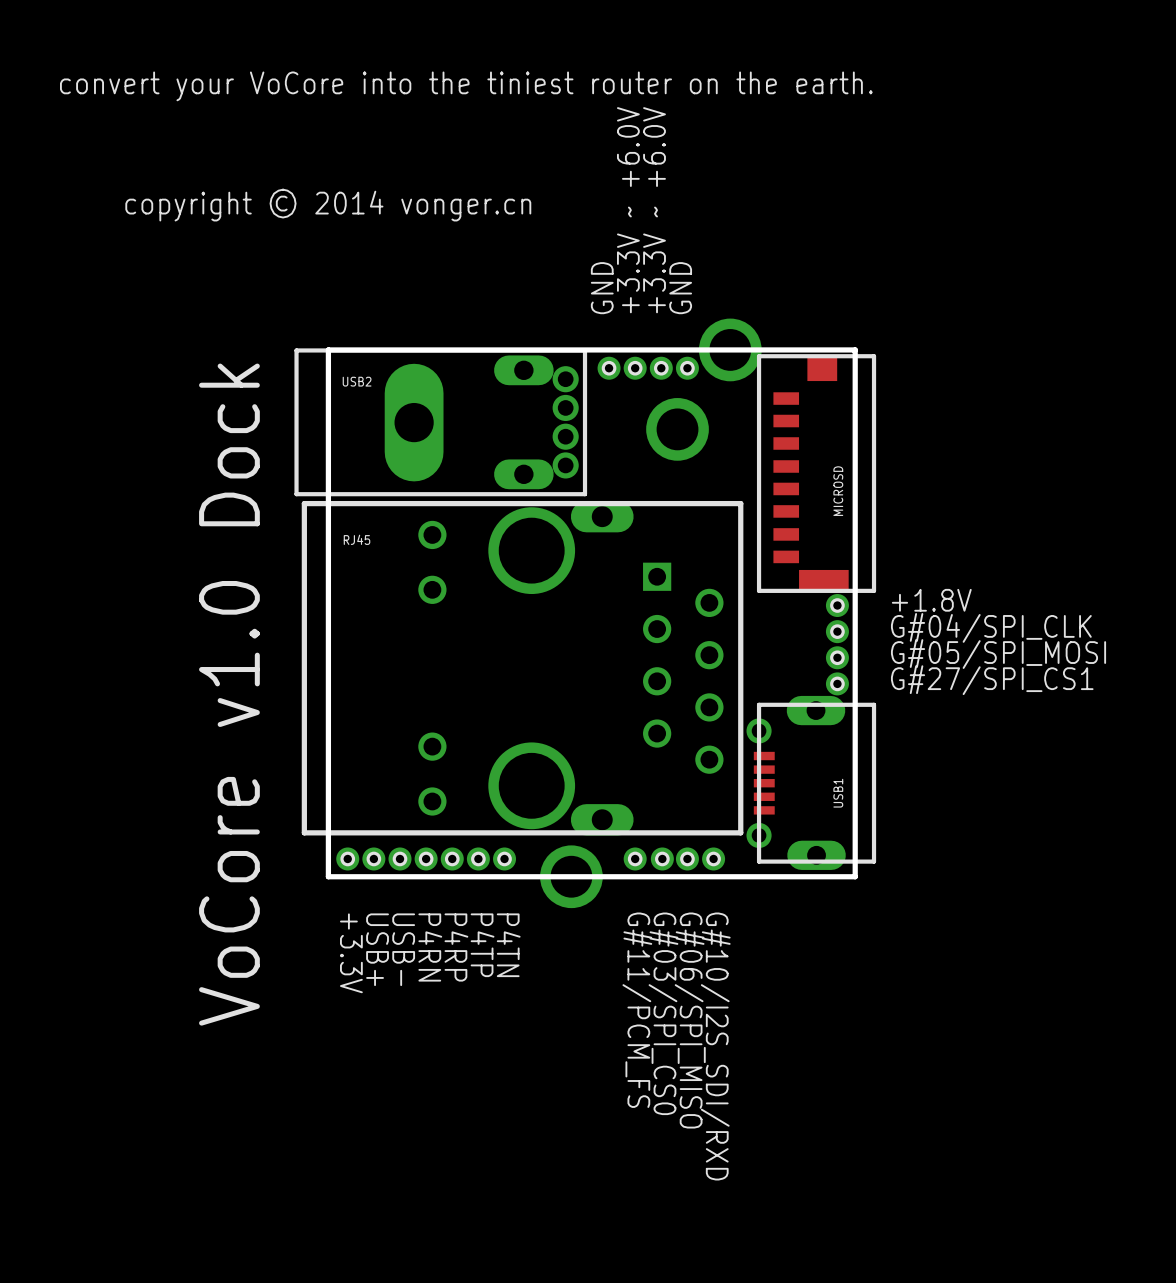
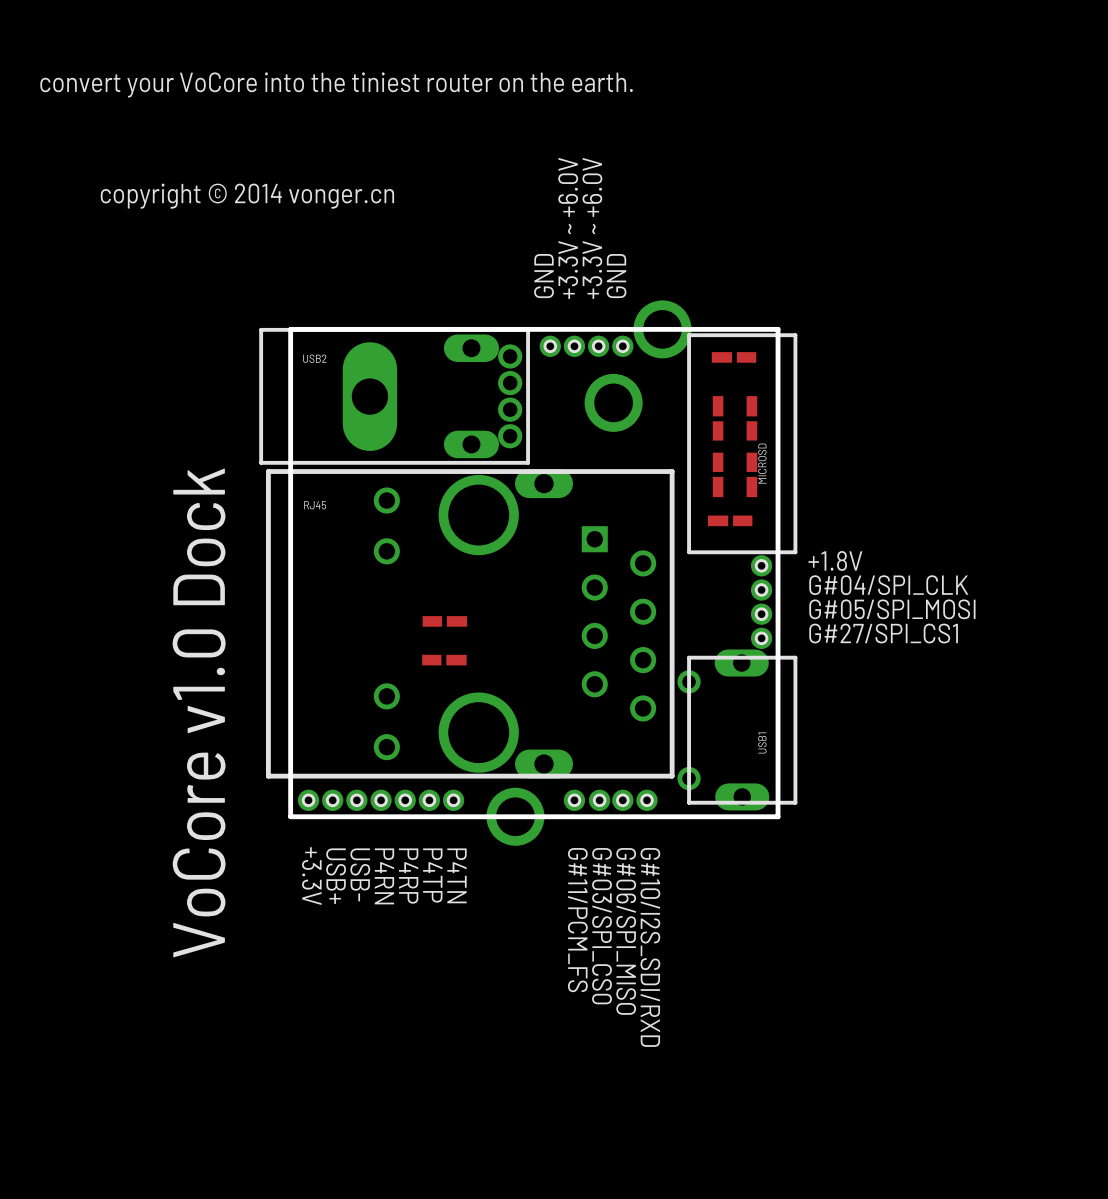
MICROSD footprint: [756, 354, 877, 593] -> [687, 333, 798, 555]
part: none -> (734, 357)
part: none -> (718, 418)
part: none -> (751, 418)
part: none -> (718, 474)
part: none -> (751, 474)
part: none -> (730, 520)
part: none -> (444, 621)
USB1 footprint: [746, 695, 877, 870] -> [677, 649, 798, 811]
part: none -> (444, 660)

